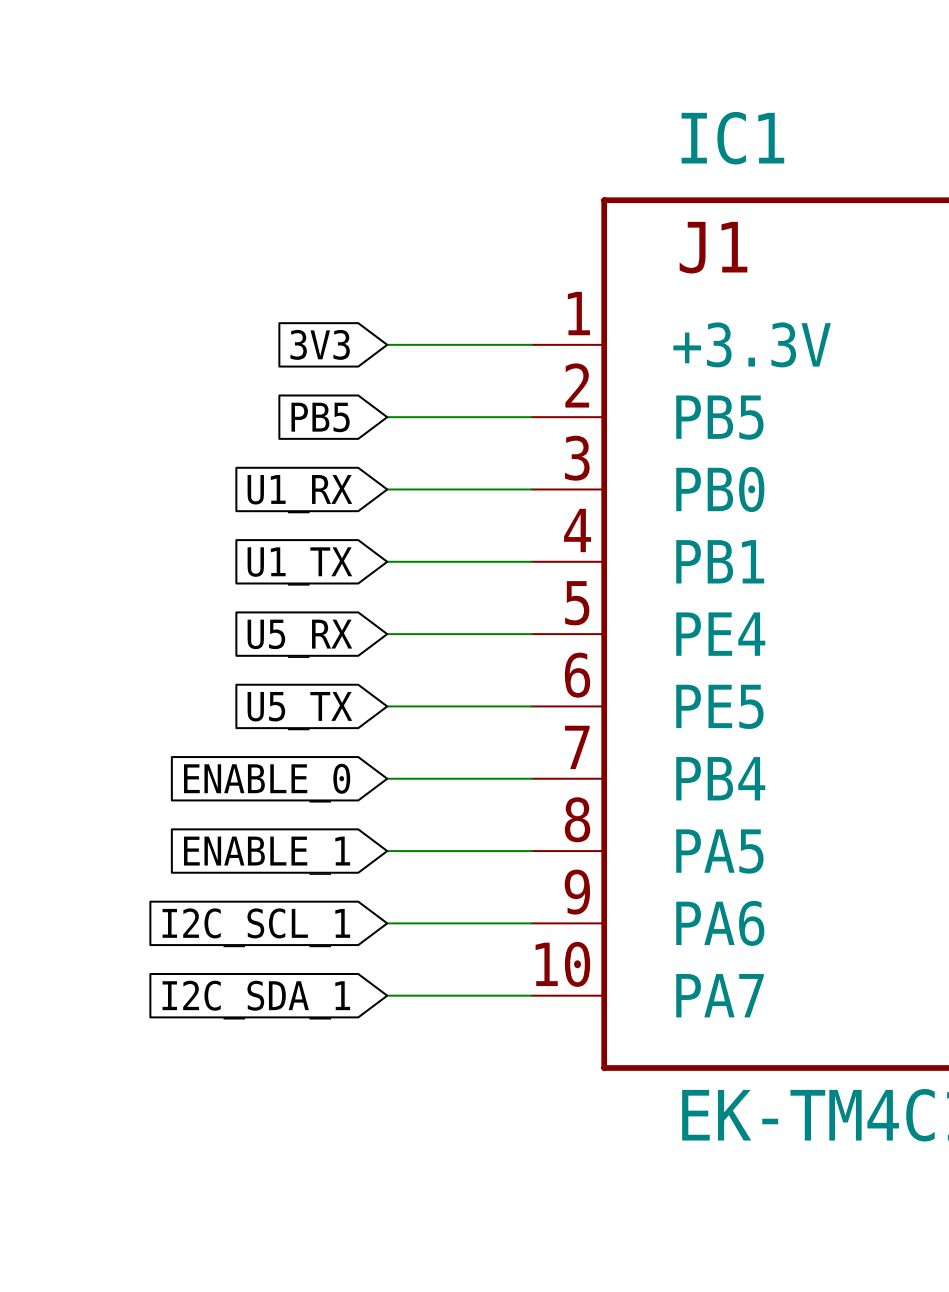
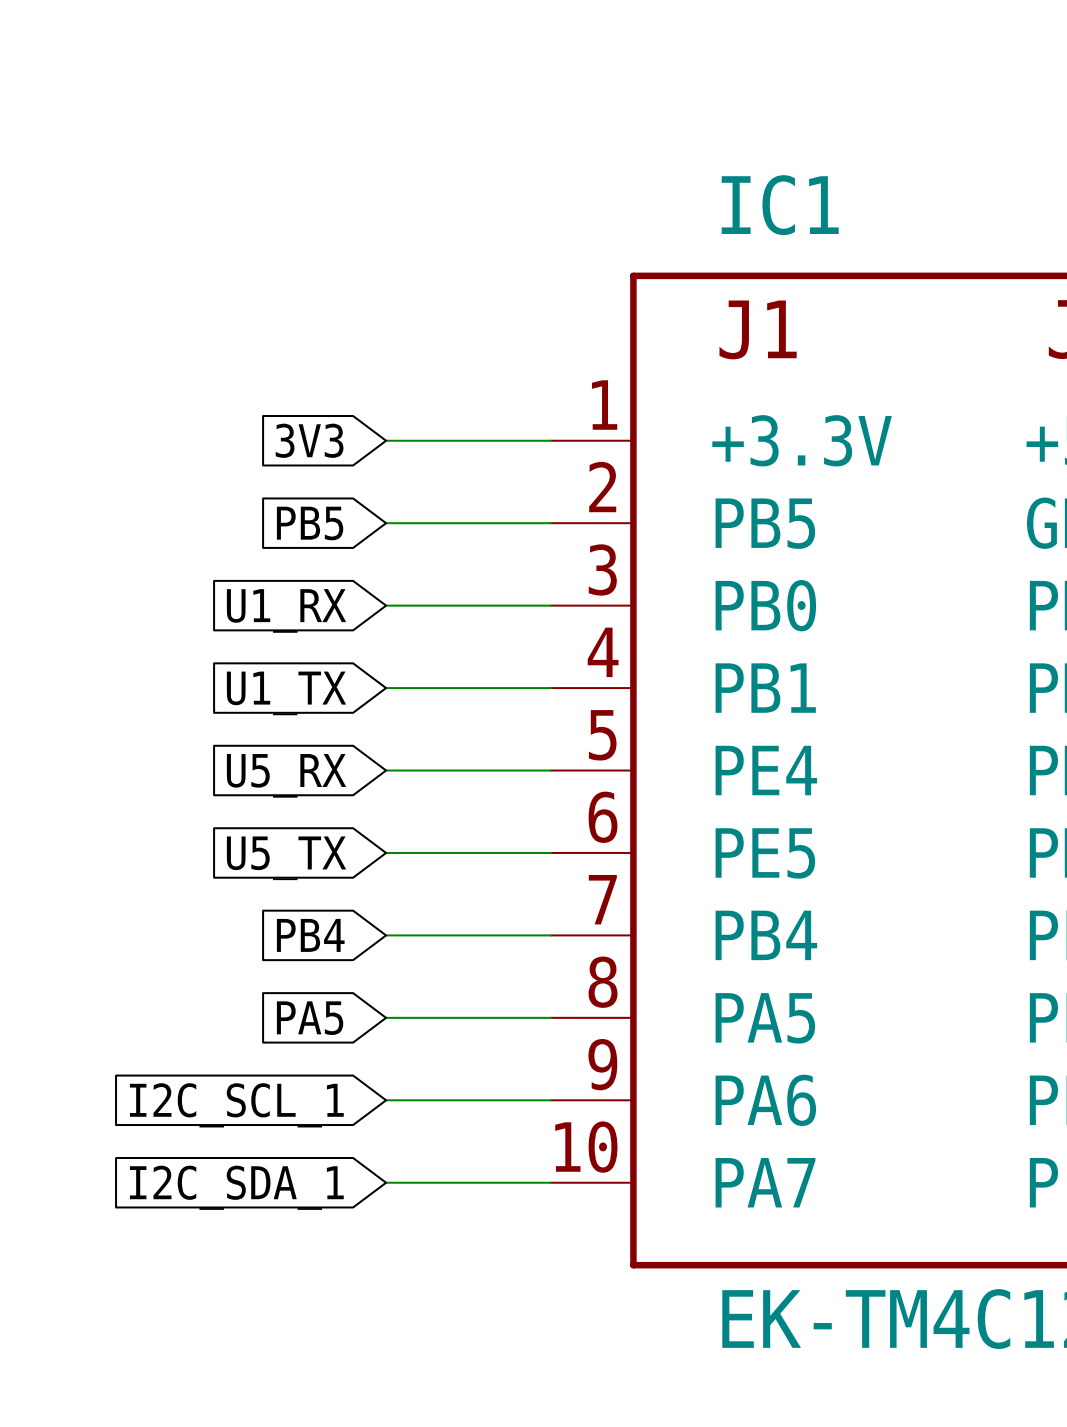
global label: ENABLE_0 (267, 783) -> PB4 (310, 935)
global label: ENABLE_1 (267, 855) -> PA5 (310, 1018)

